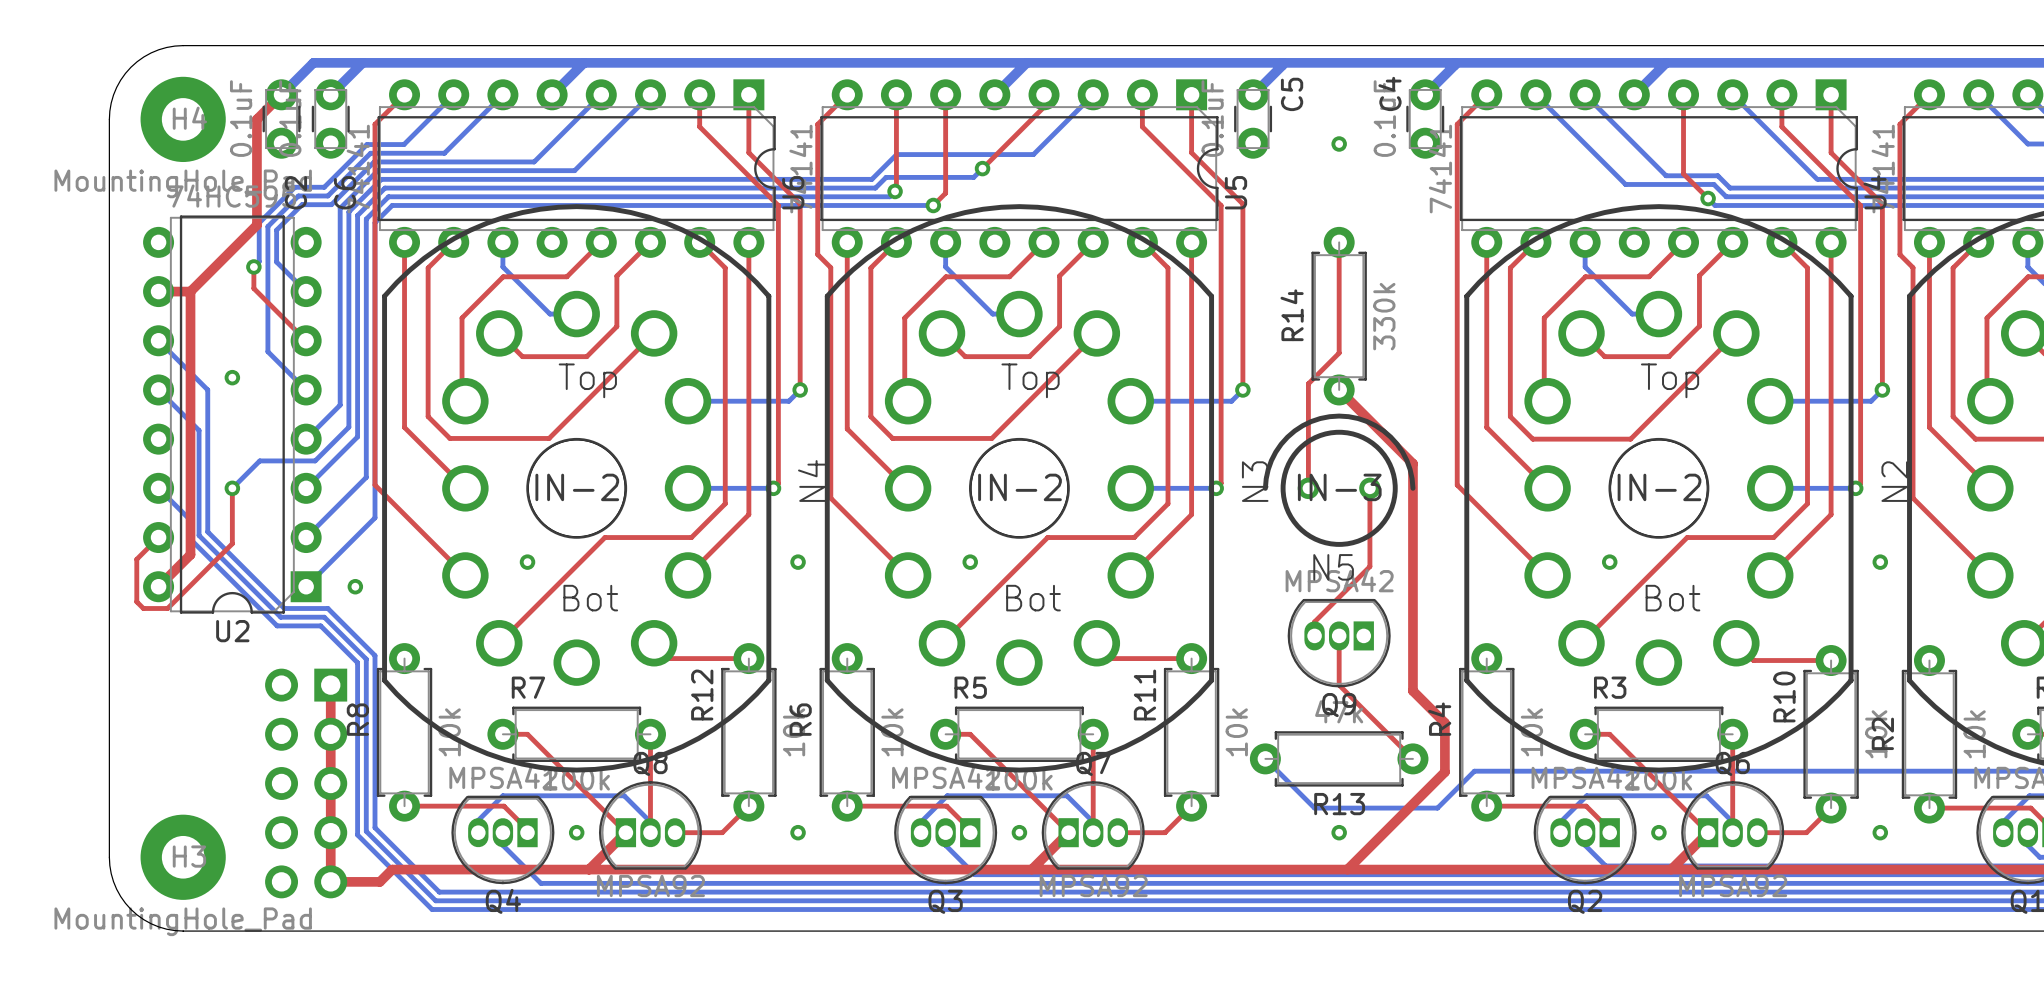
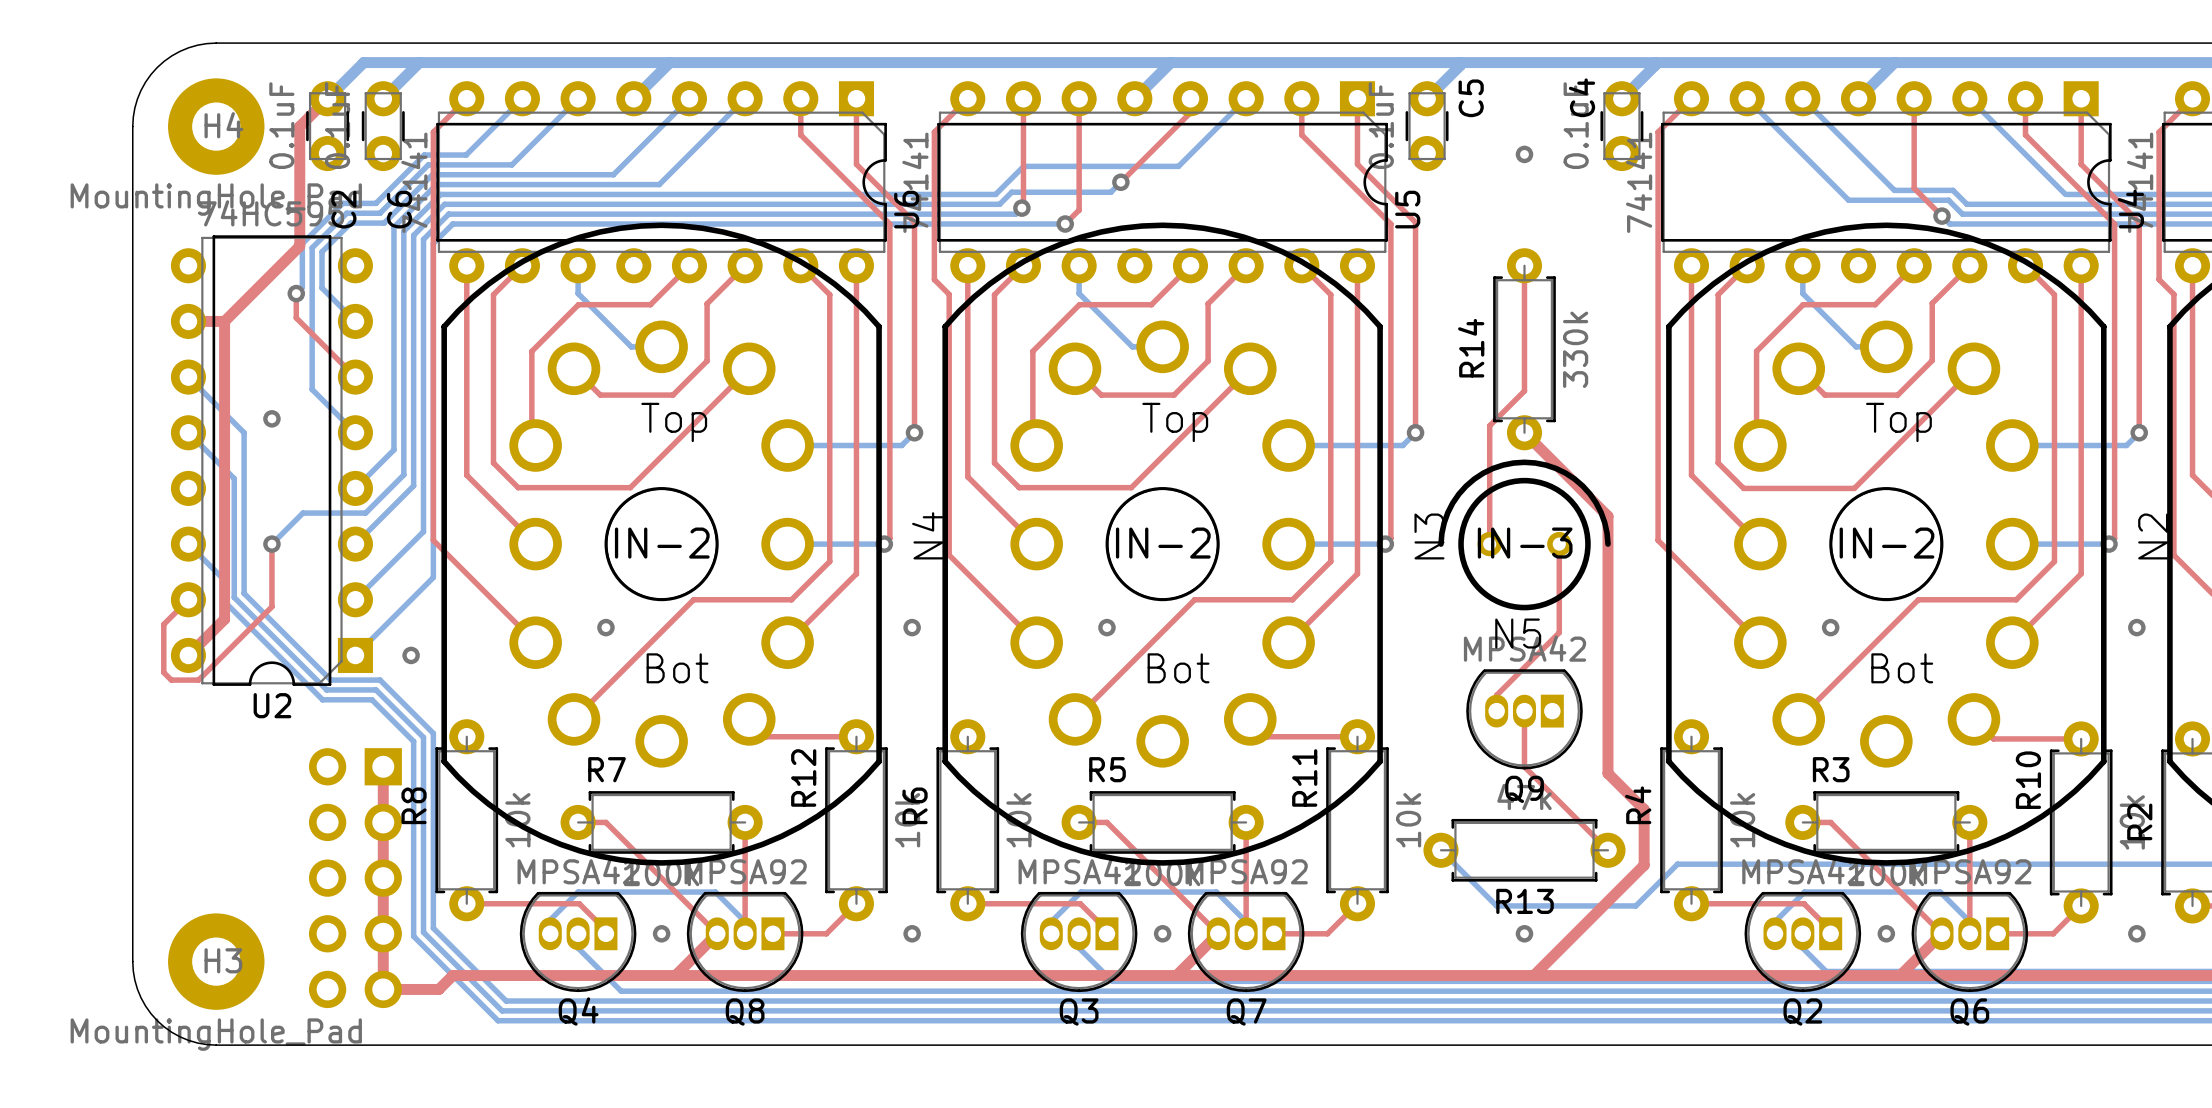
Q8 rotation: 0° (650, 825) -> 180° (745, 942)
Q7 rotation: 0° (1093, 825) -> 180° (1246, 942)
Q6 rotation: 0° (1732, 825) -> 180° (1969, 942)

